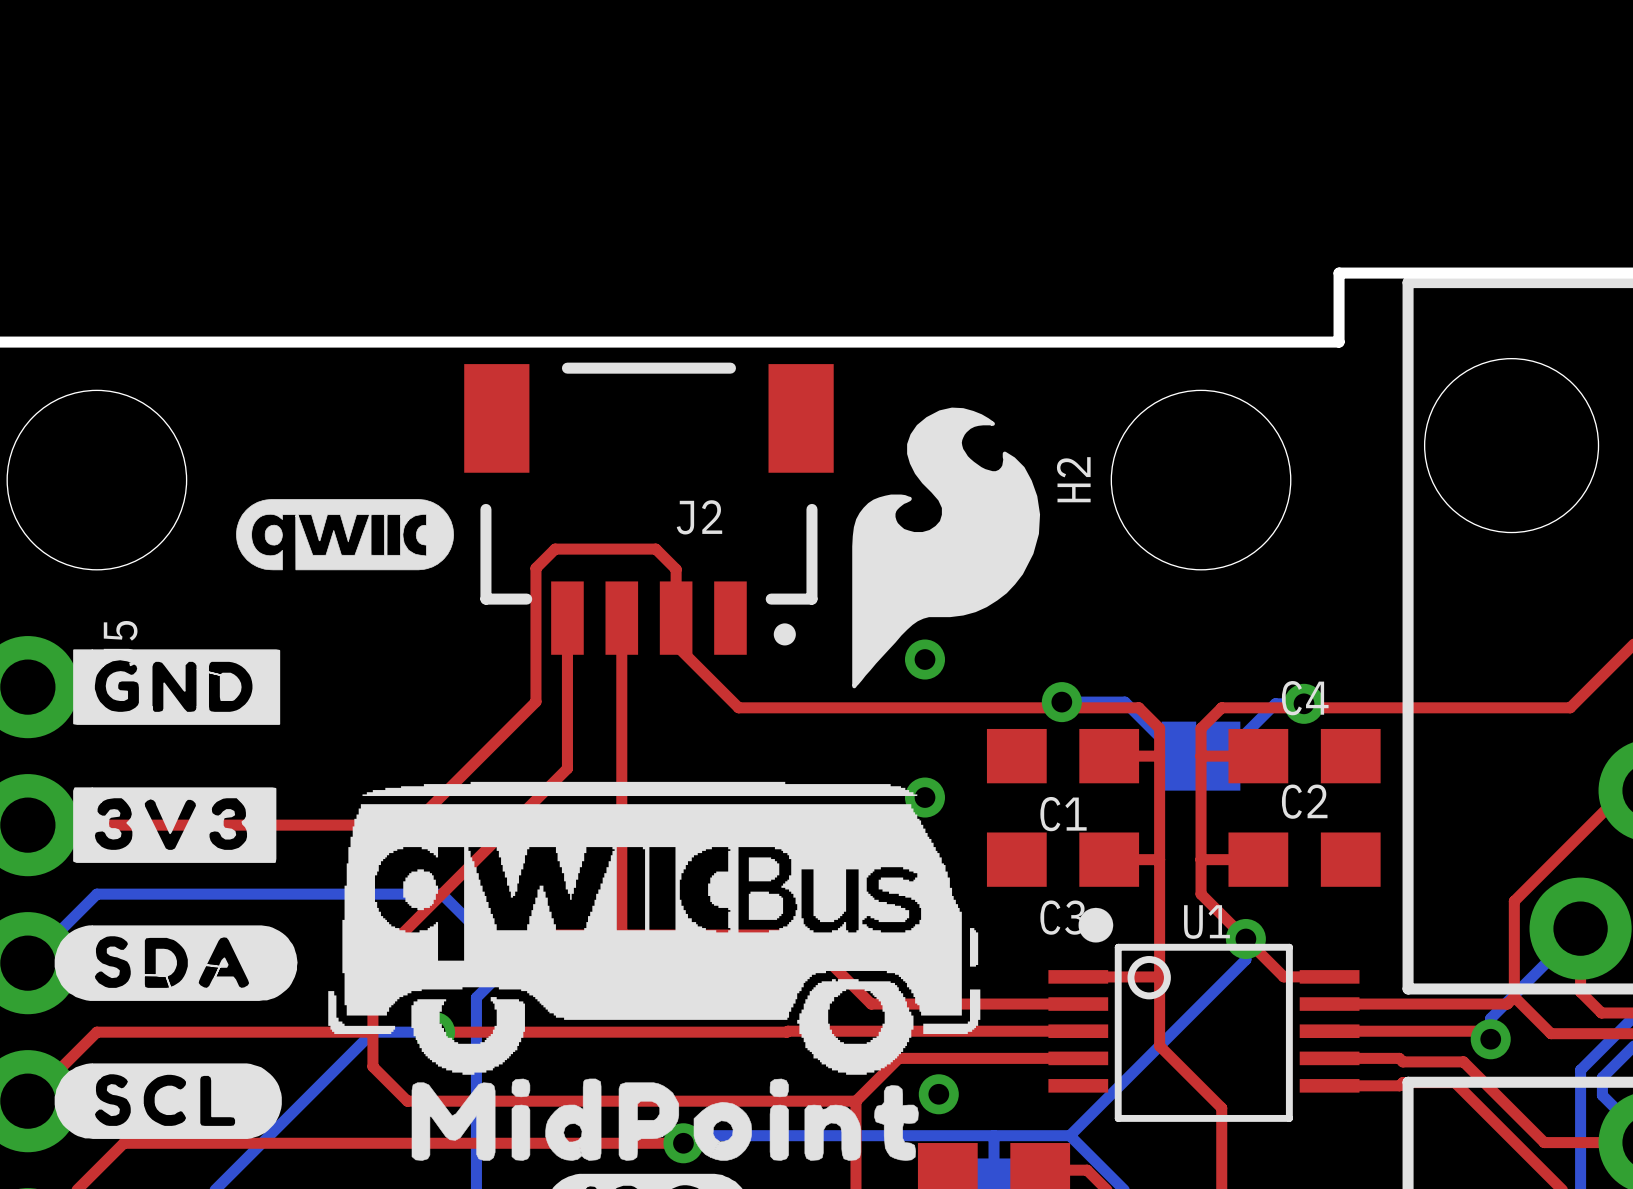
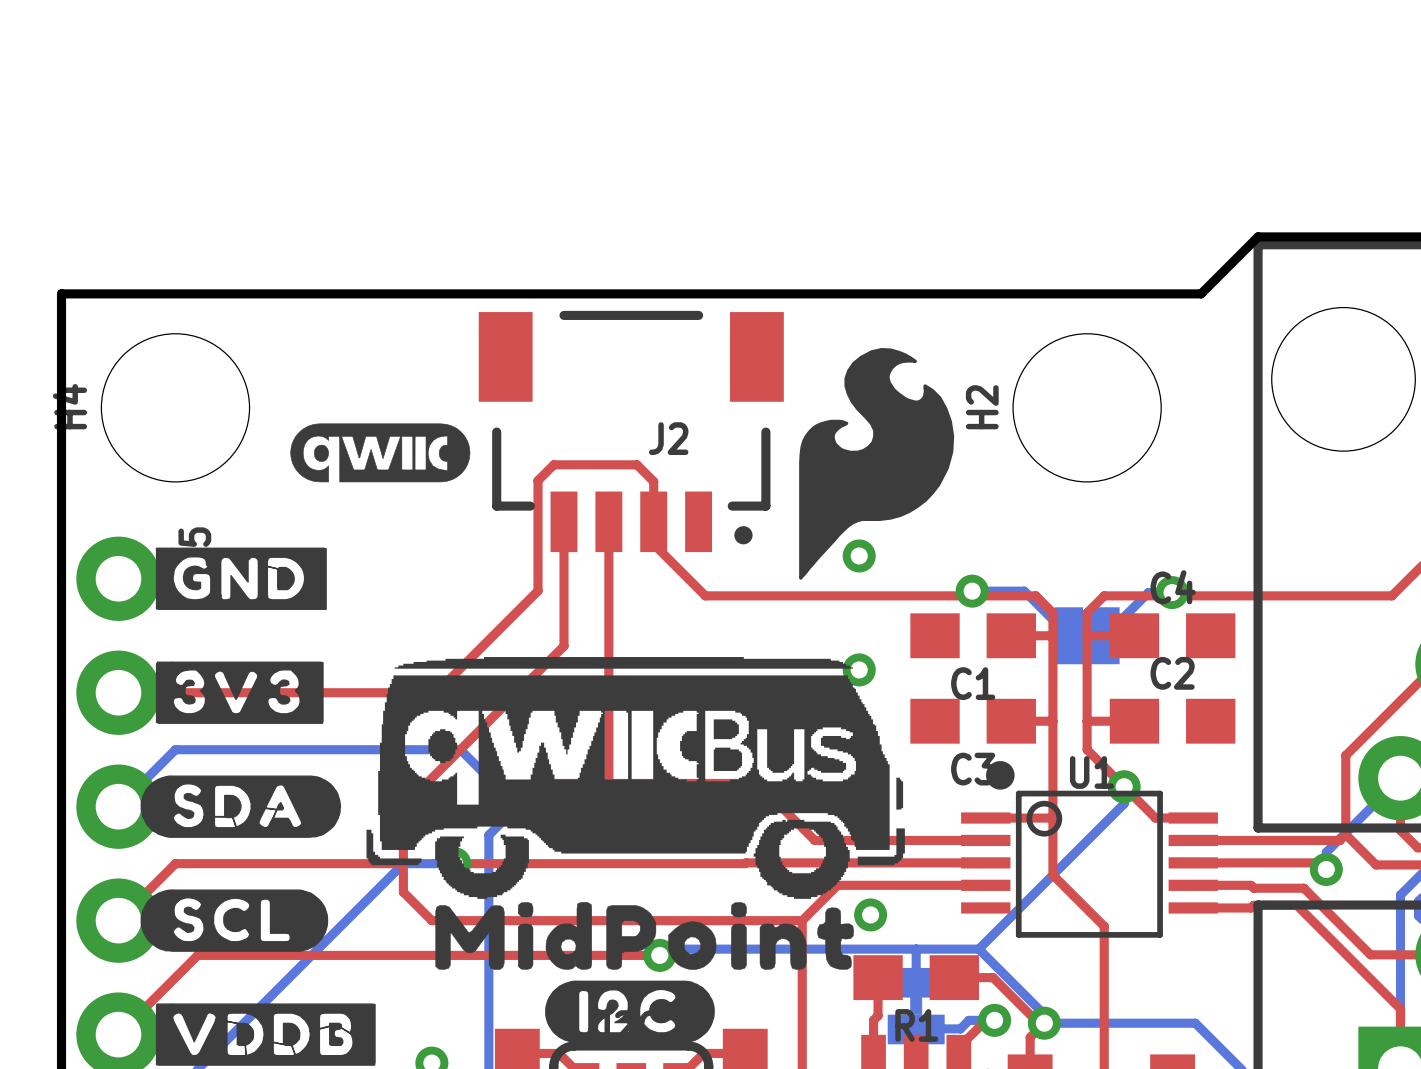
board edge: (1408, 273) (1339, 273) (1339, 342) -> (1258, 236) (1201, 293)

